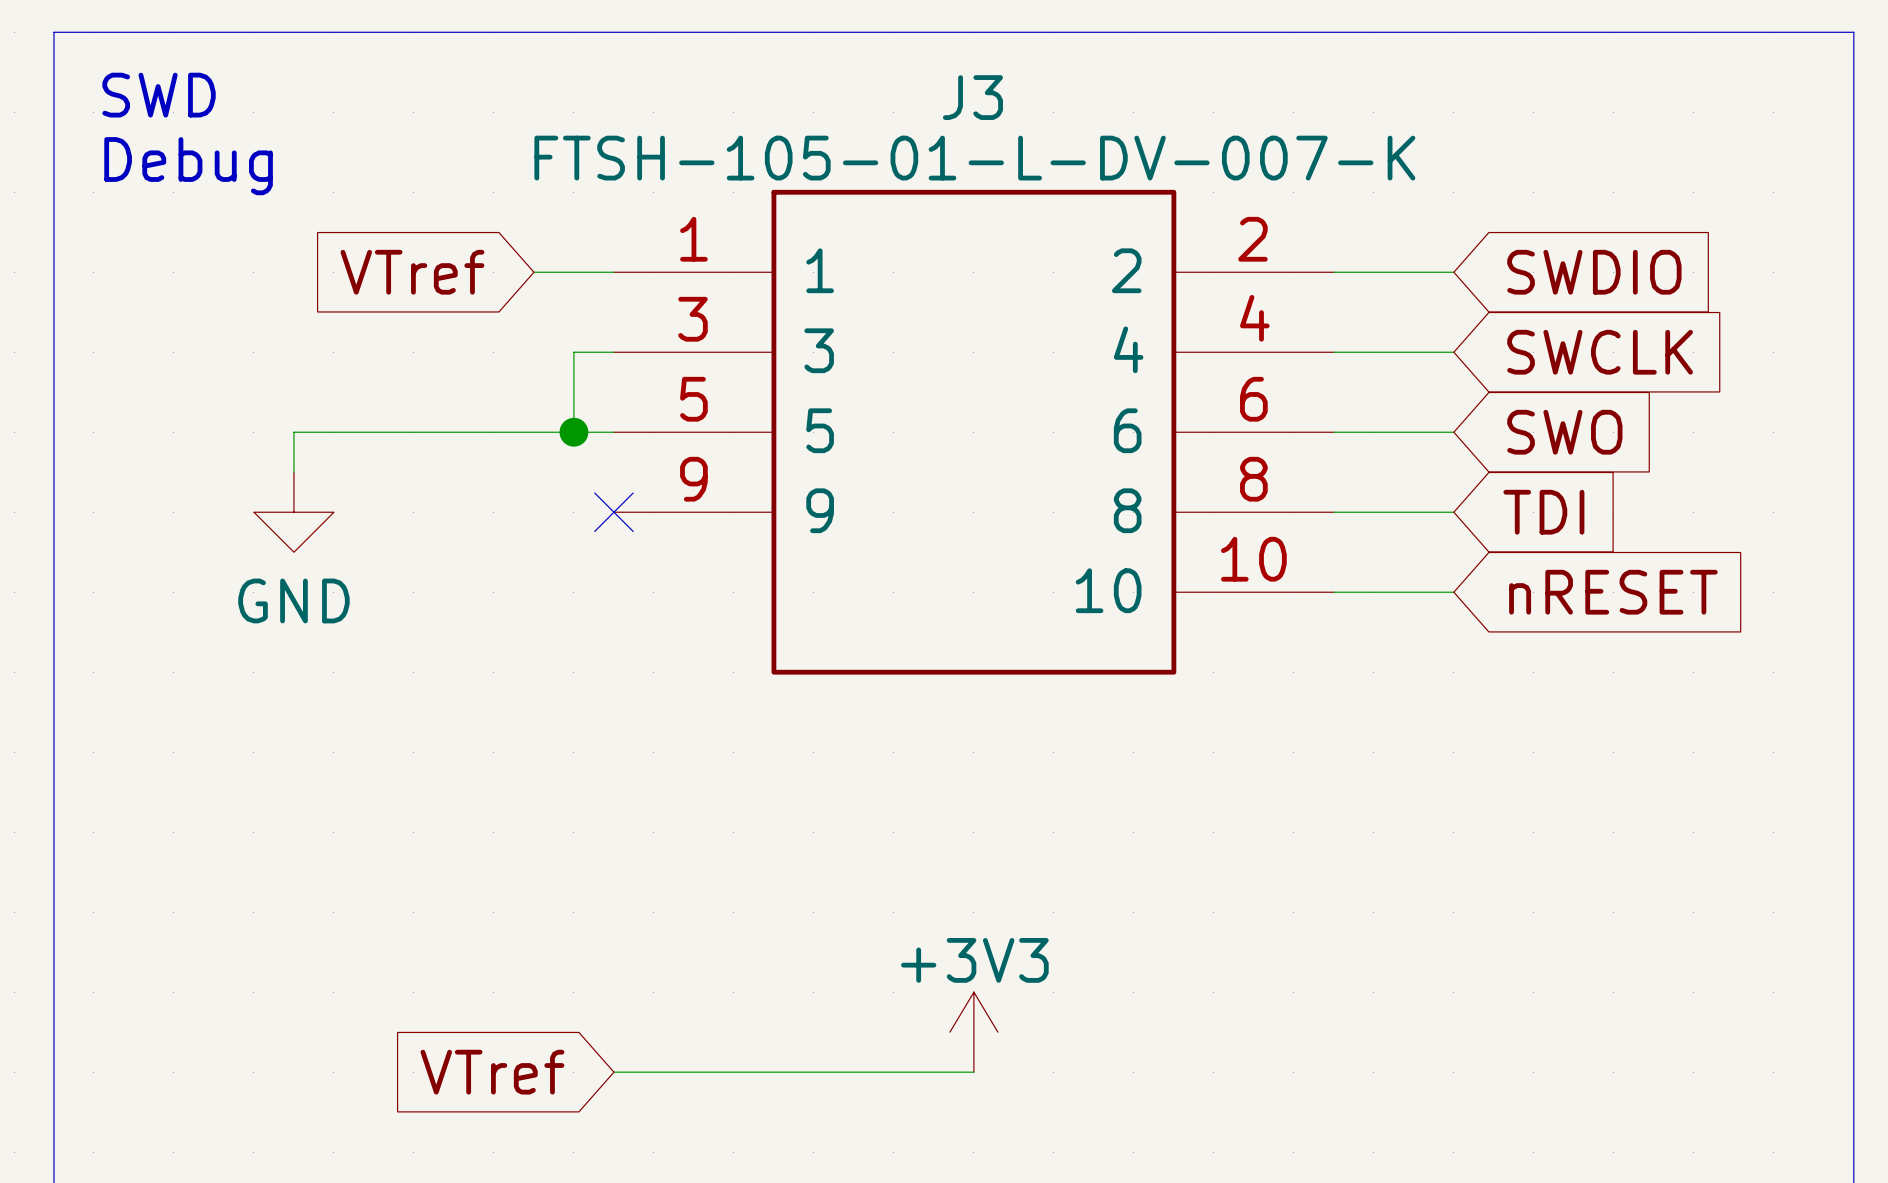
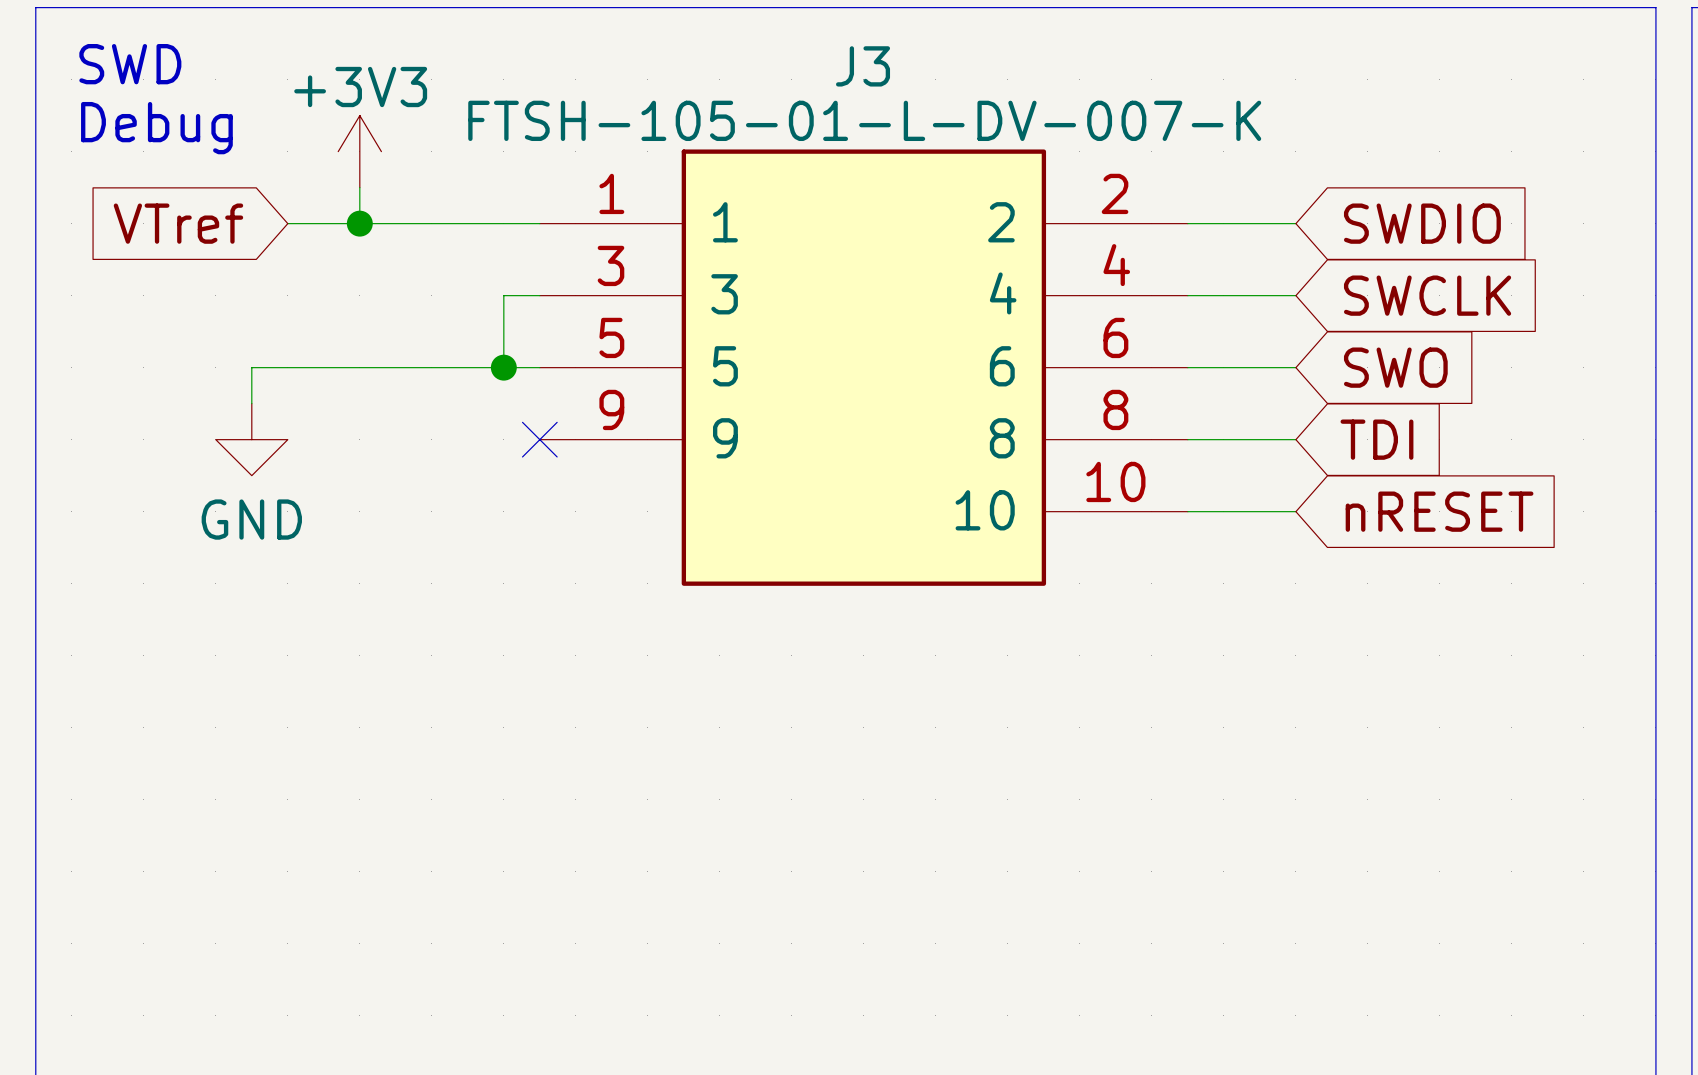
J3 symbol: [613, 189, 1334, 675] -> [539, 149, 1188, 586]
power symbol: none -> +3V3 (359, 151)
wire: none -> (359, 187) (359, 223)
wire: none -> (287, 223) (467, 223)
global label position: VTref (412, 272) -> VTref (178, 223)
junction: none -> (359, 223)
power symbol: +3V3 (973, 1032) -> none
global label: VTref (492, 1072) -> none
wire: (613, 1072) (973, 1072) -> none

